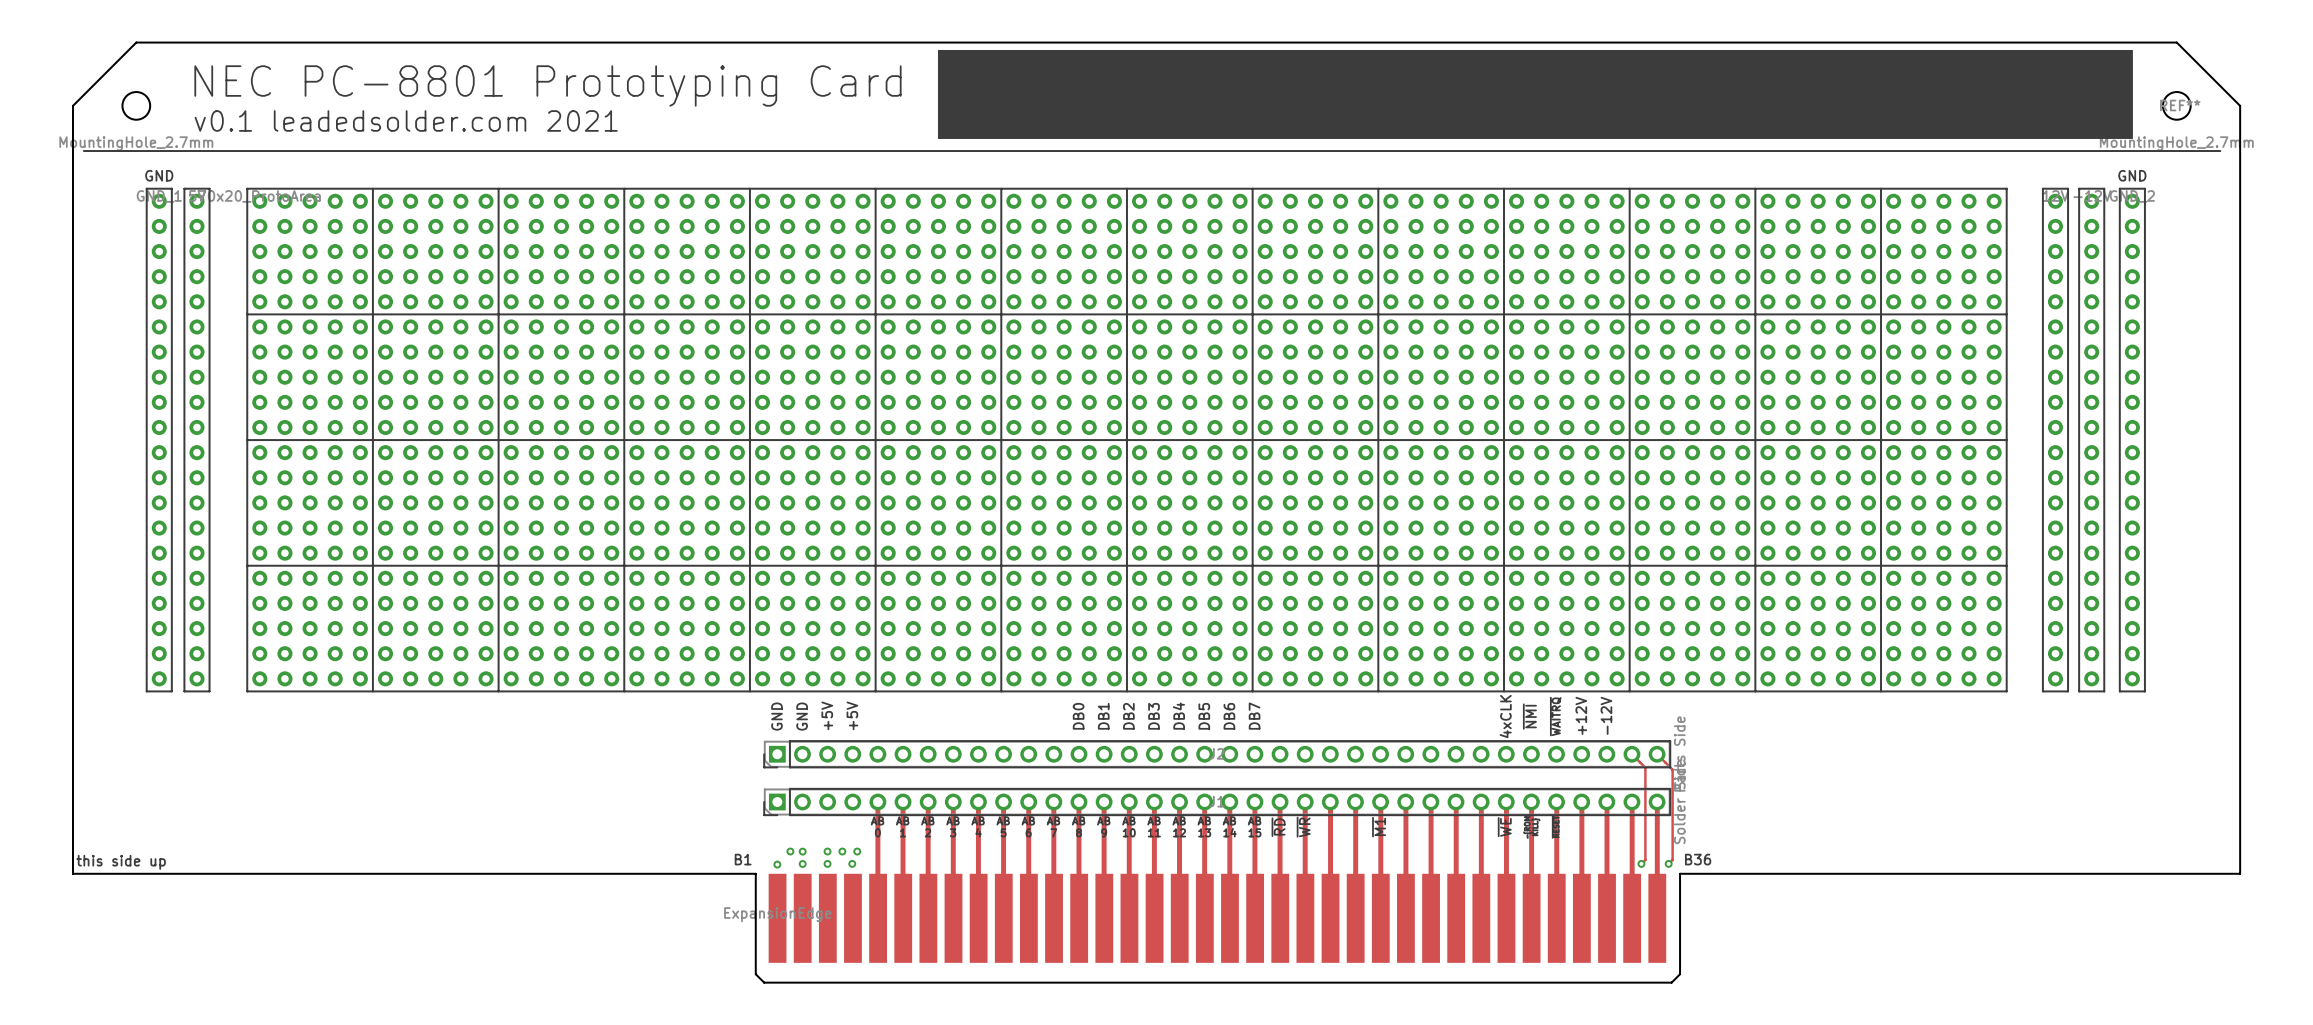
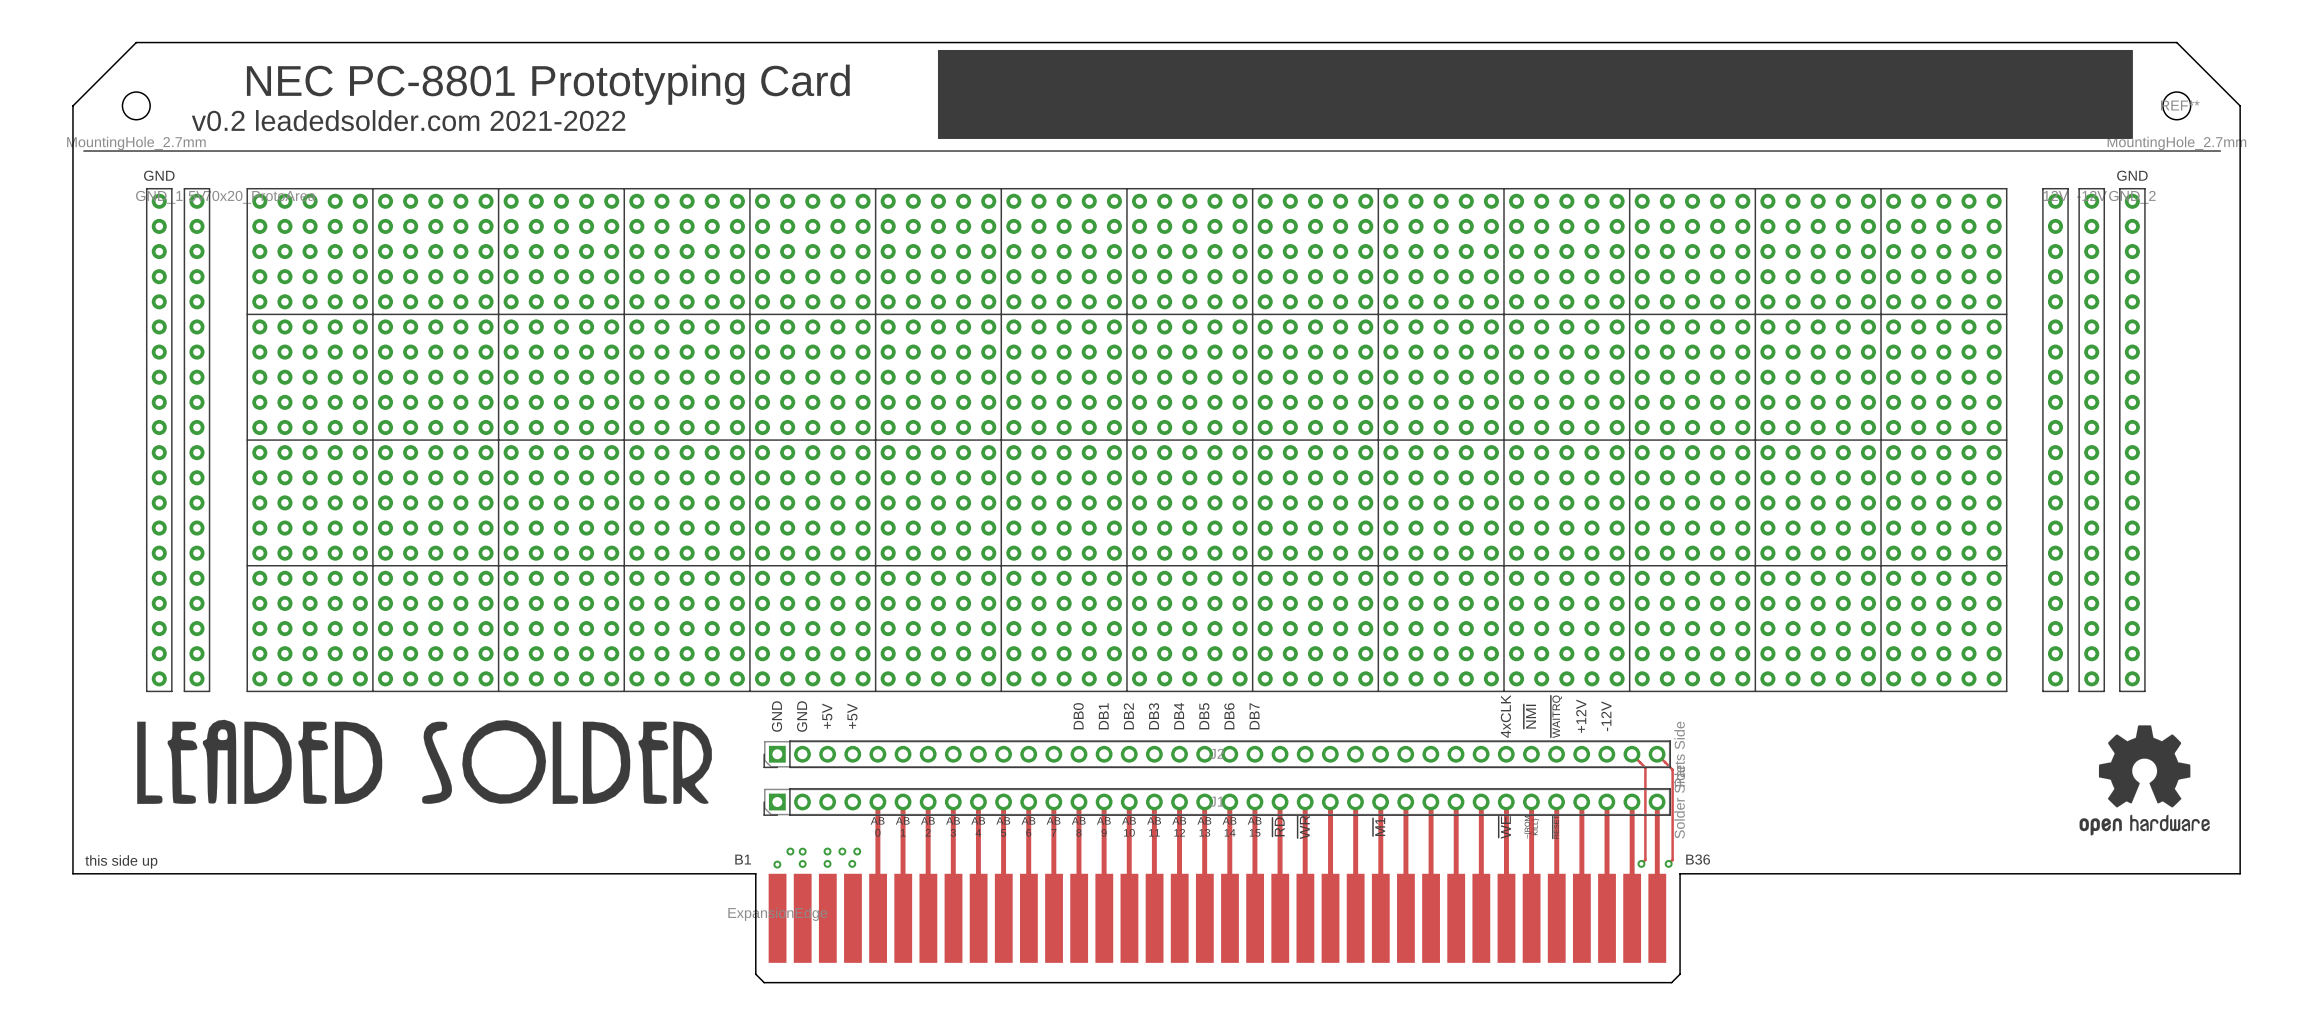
text: v0.1 leadedsolder.com 2021 (406, 120) -> v0.2 leadedsolder.com 2021-2022 (408, 120)
drawing: none -> [137, 719, 712, 804]
drawing: none -> [2079, 725, 2210, 836]

